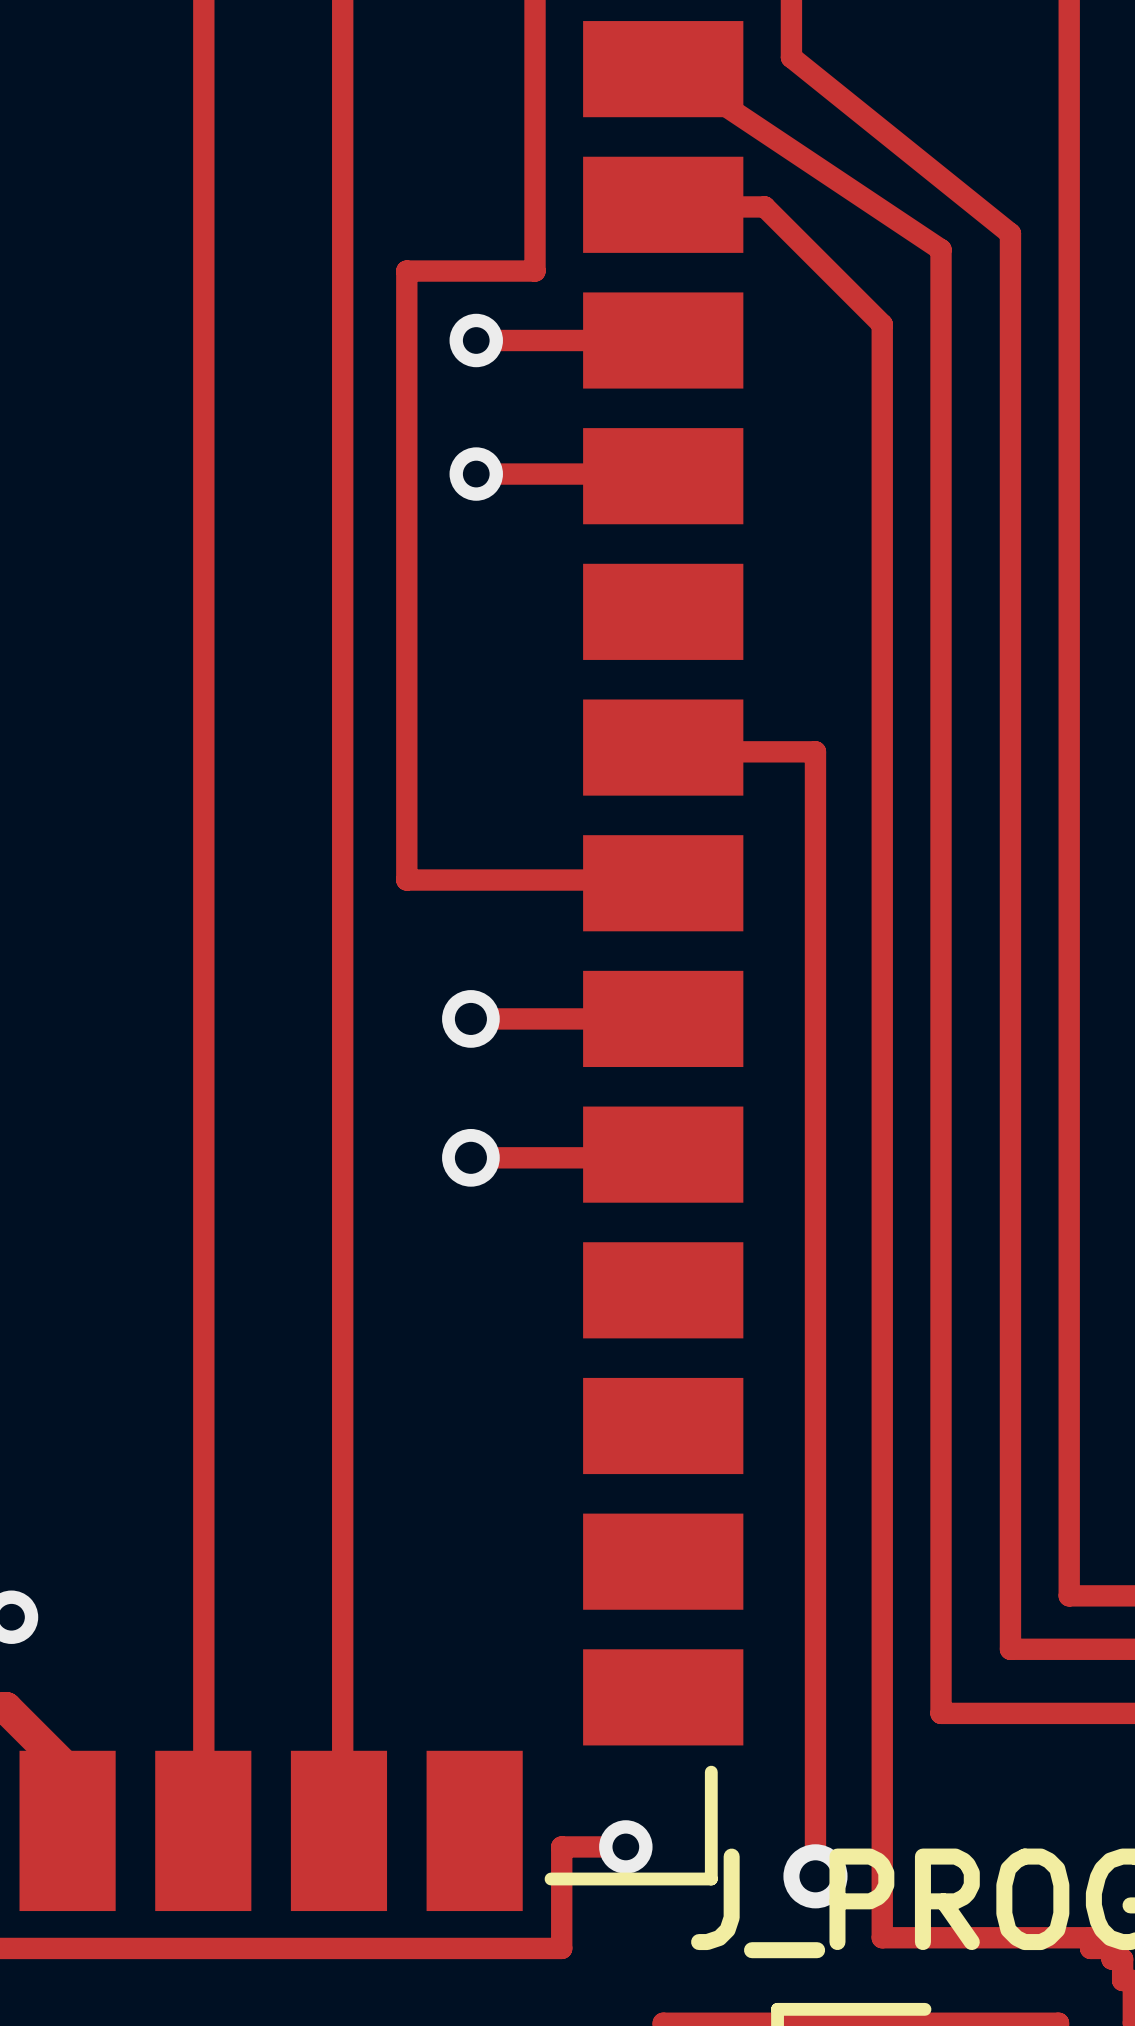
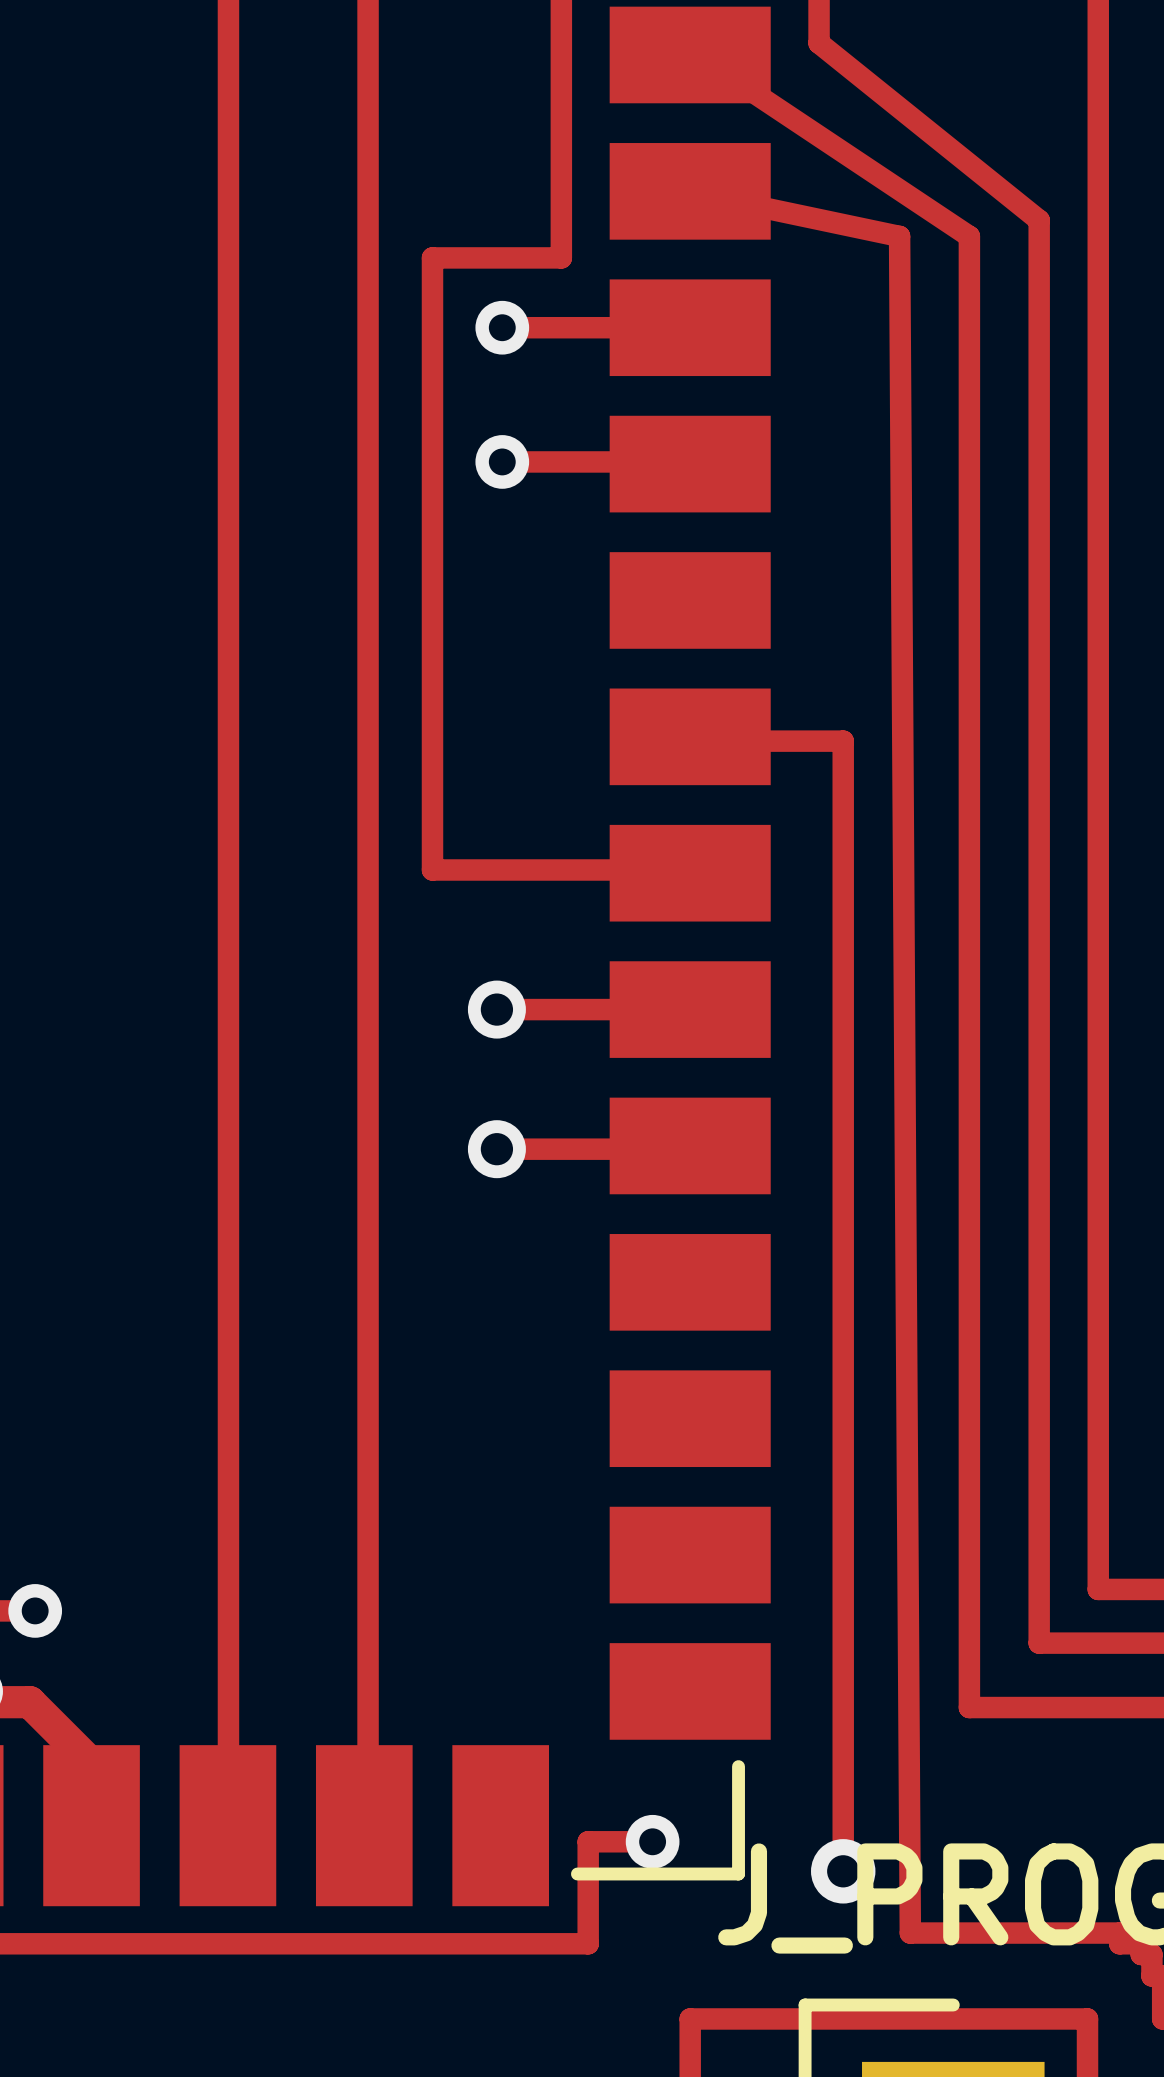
track: (668, 206) (764, 206) (882, 324) (882, 1937) -> (695, 193) (899, 236) (910, 1933)

